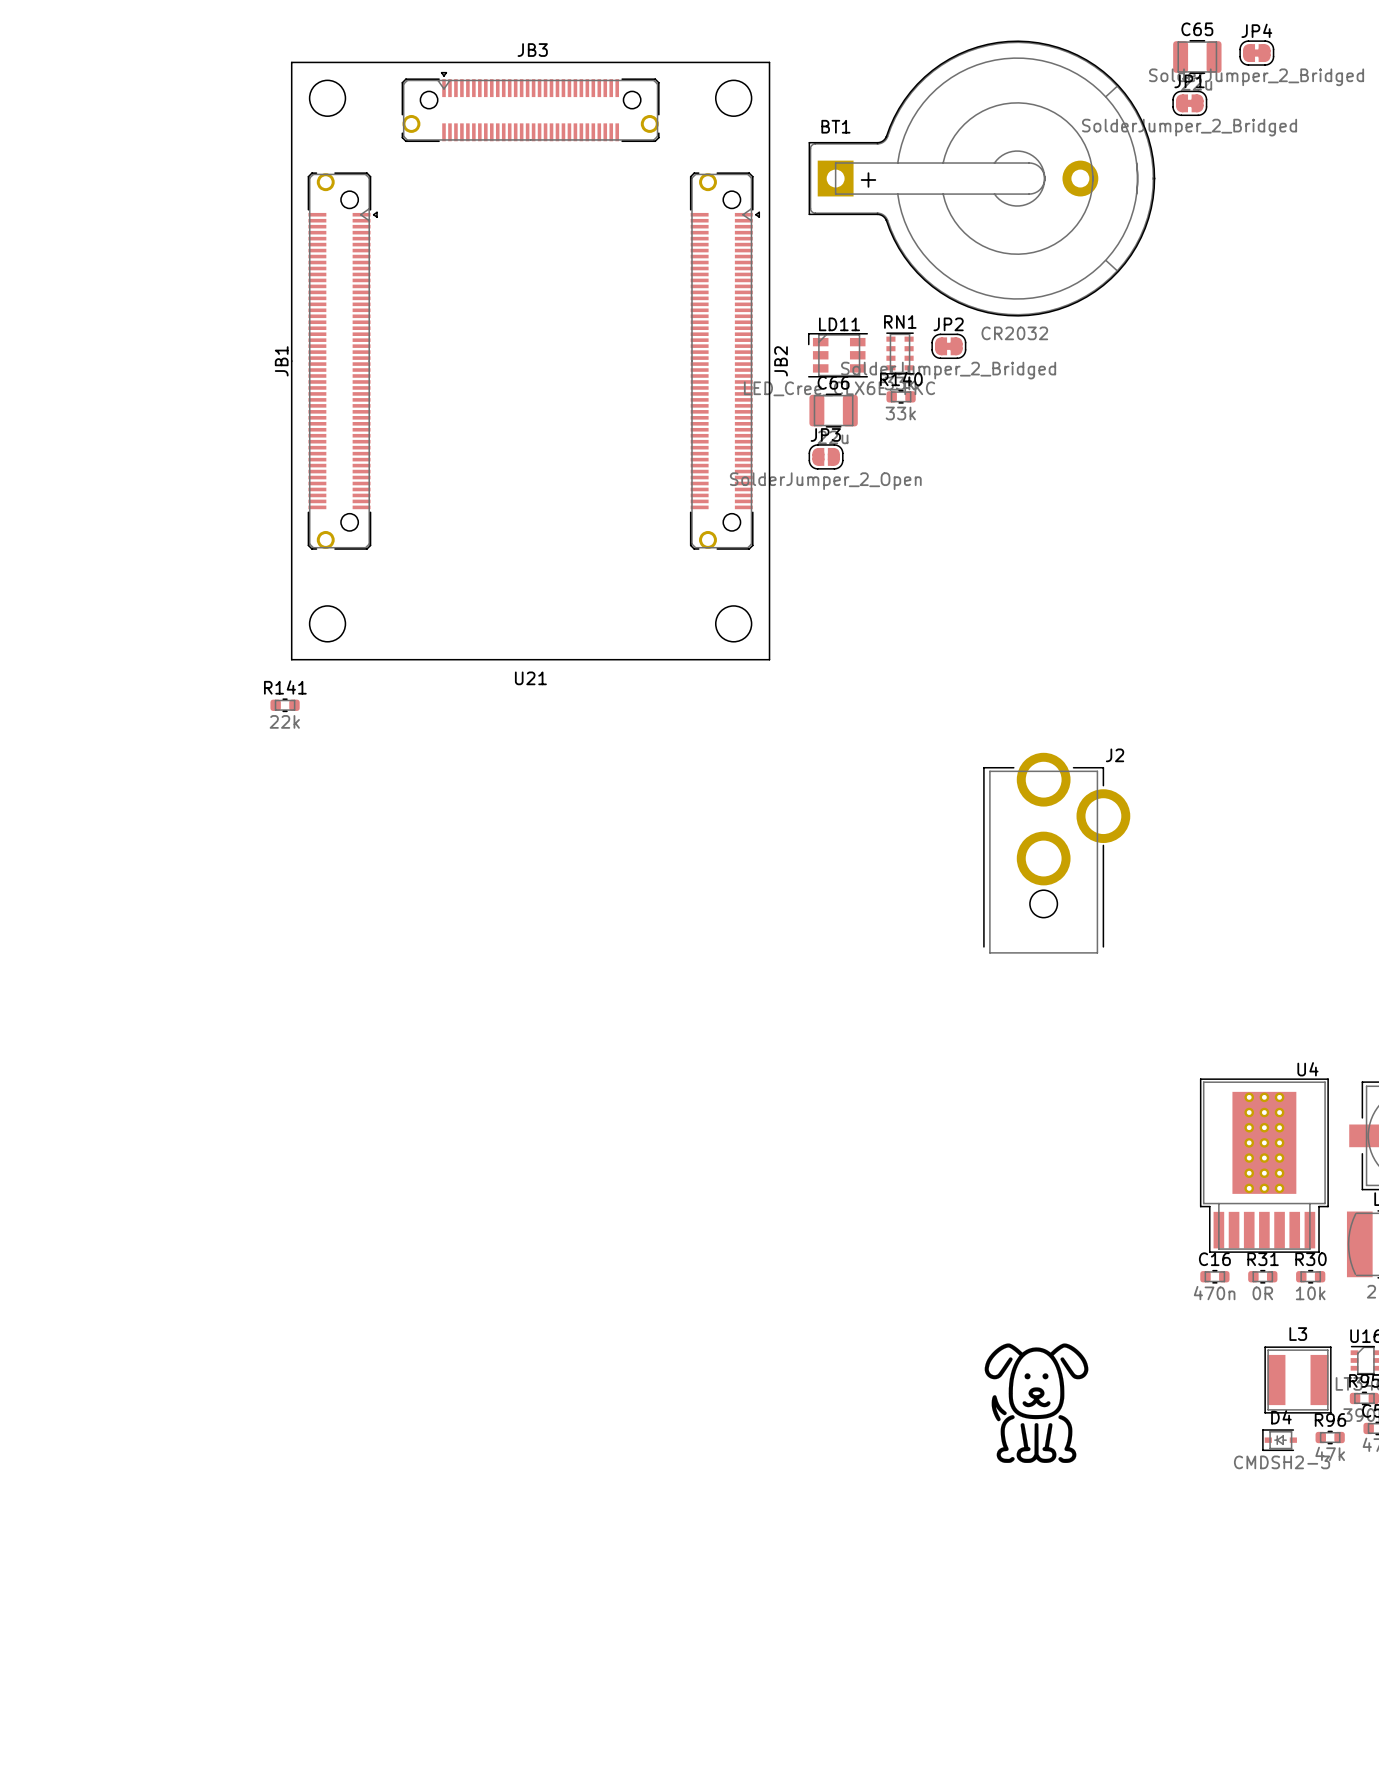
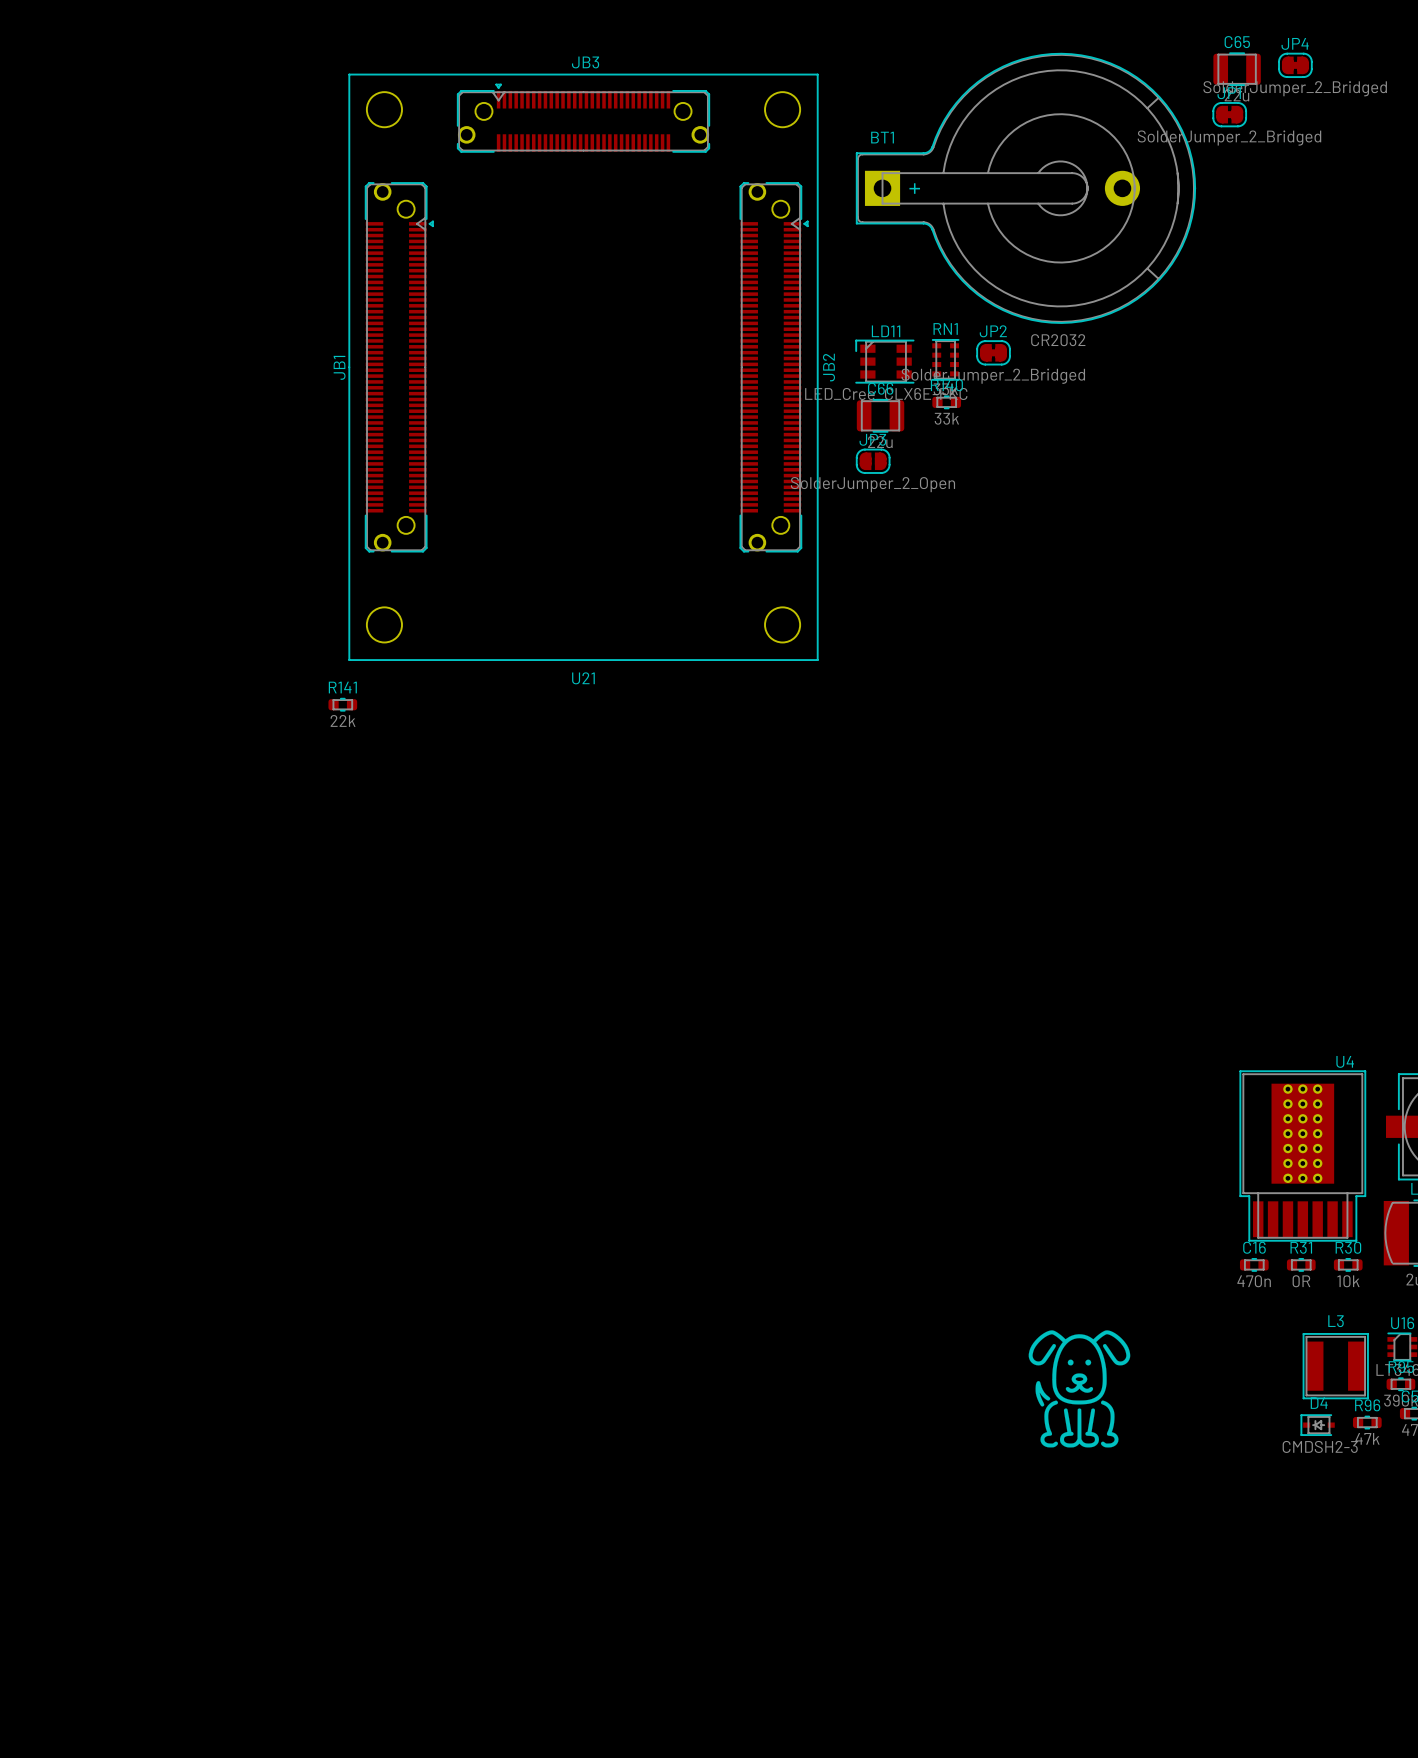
J2: (1056, 853) -> none

